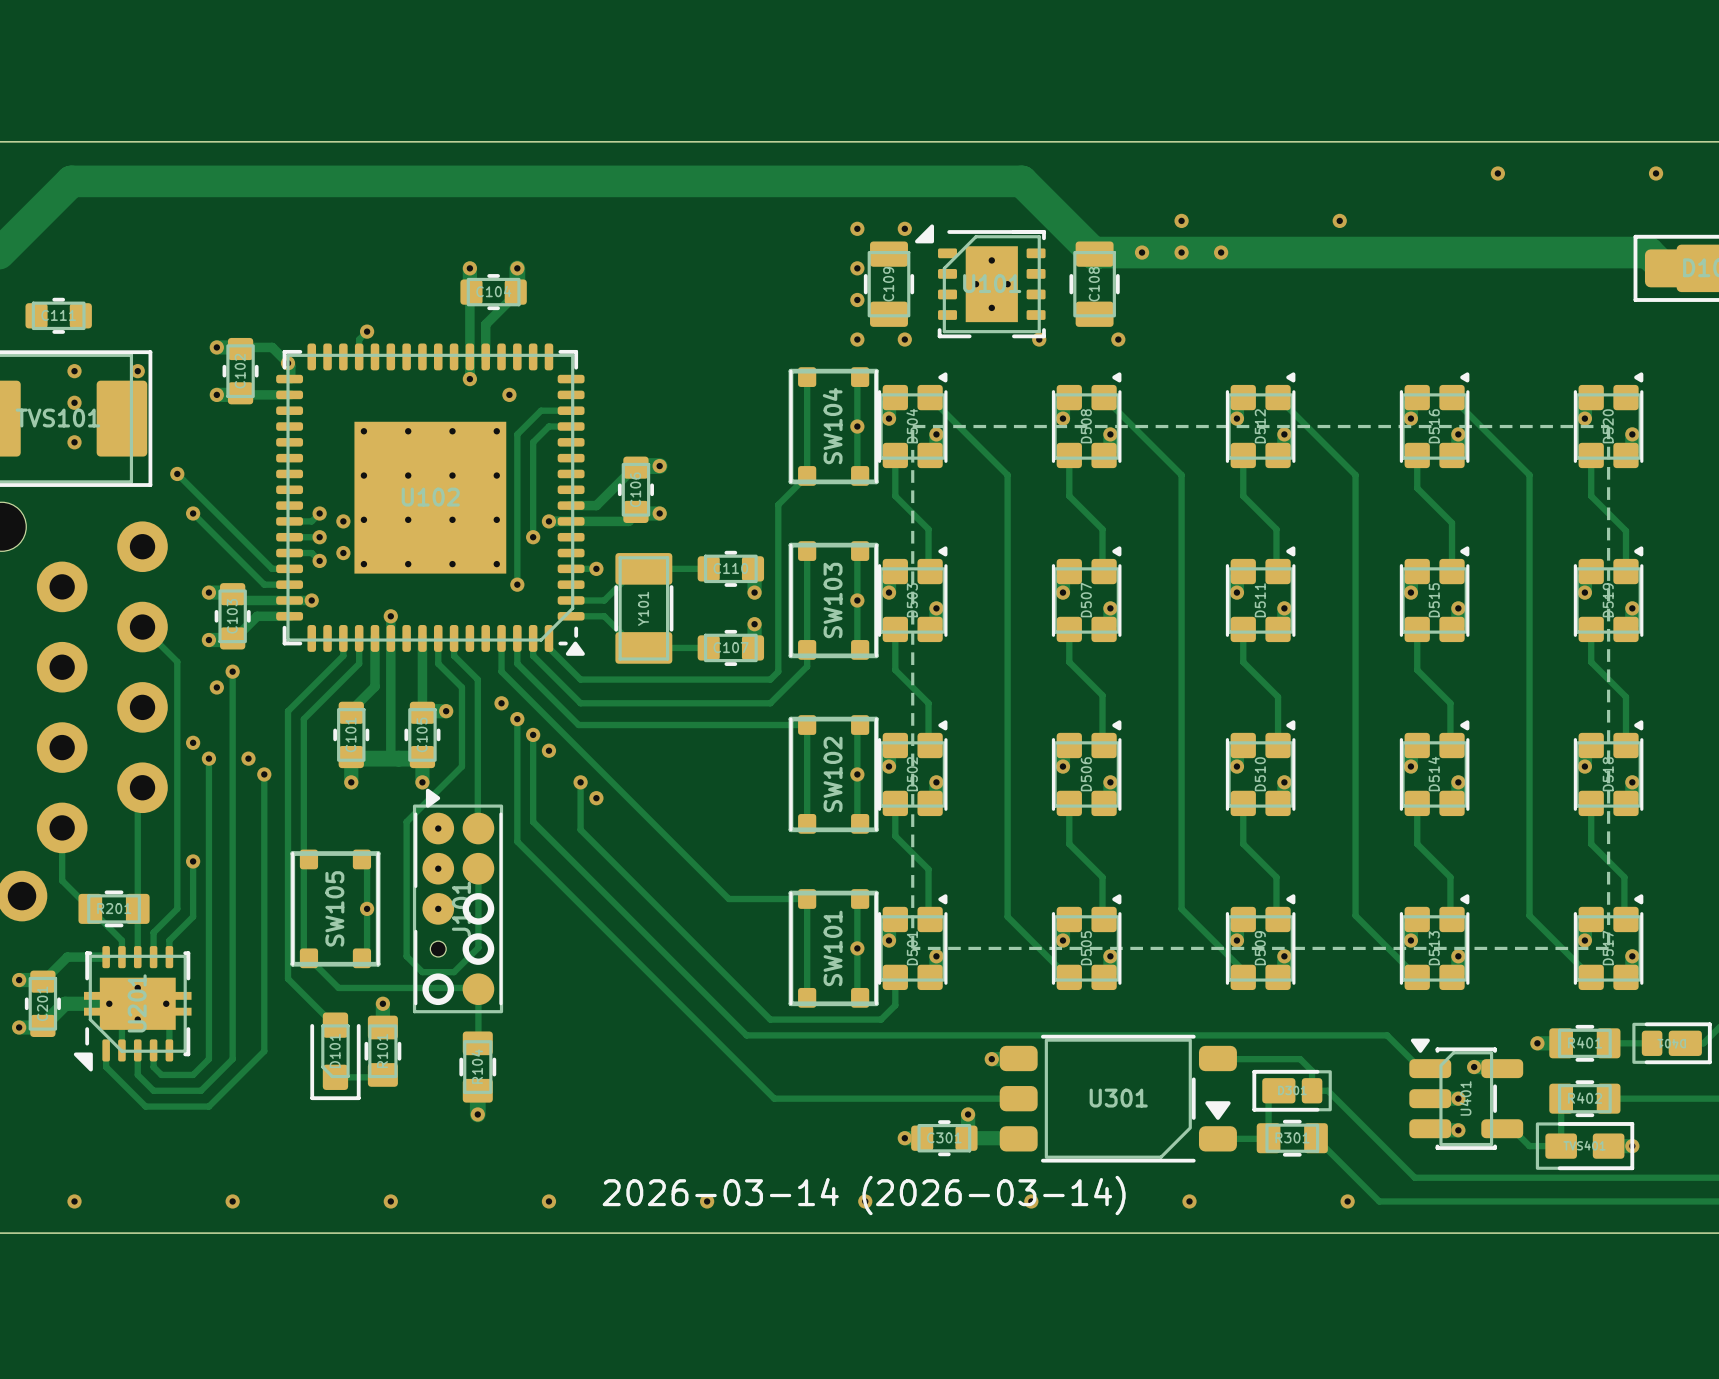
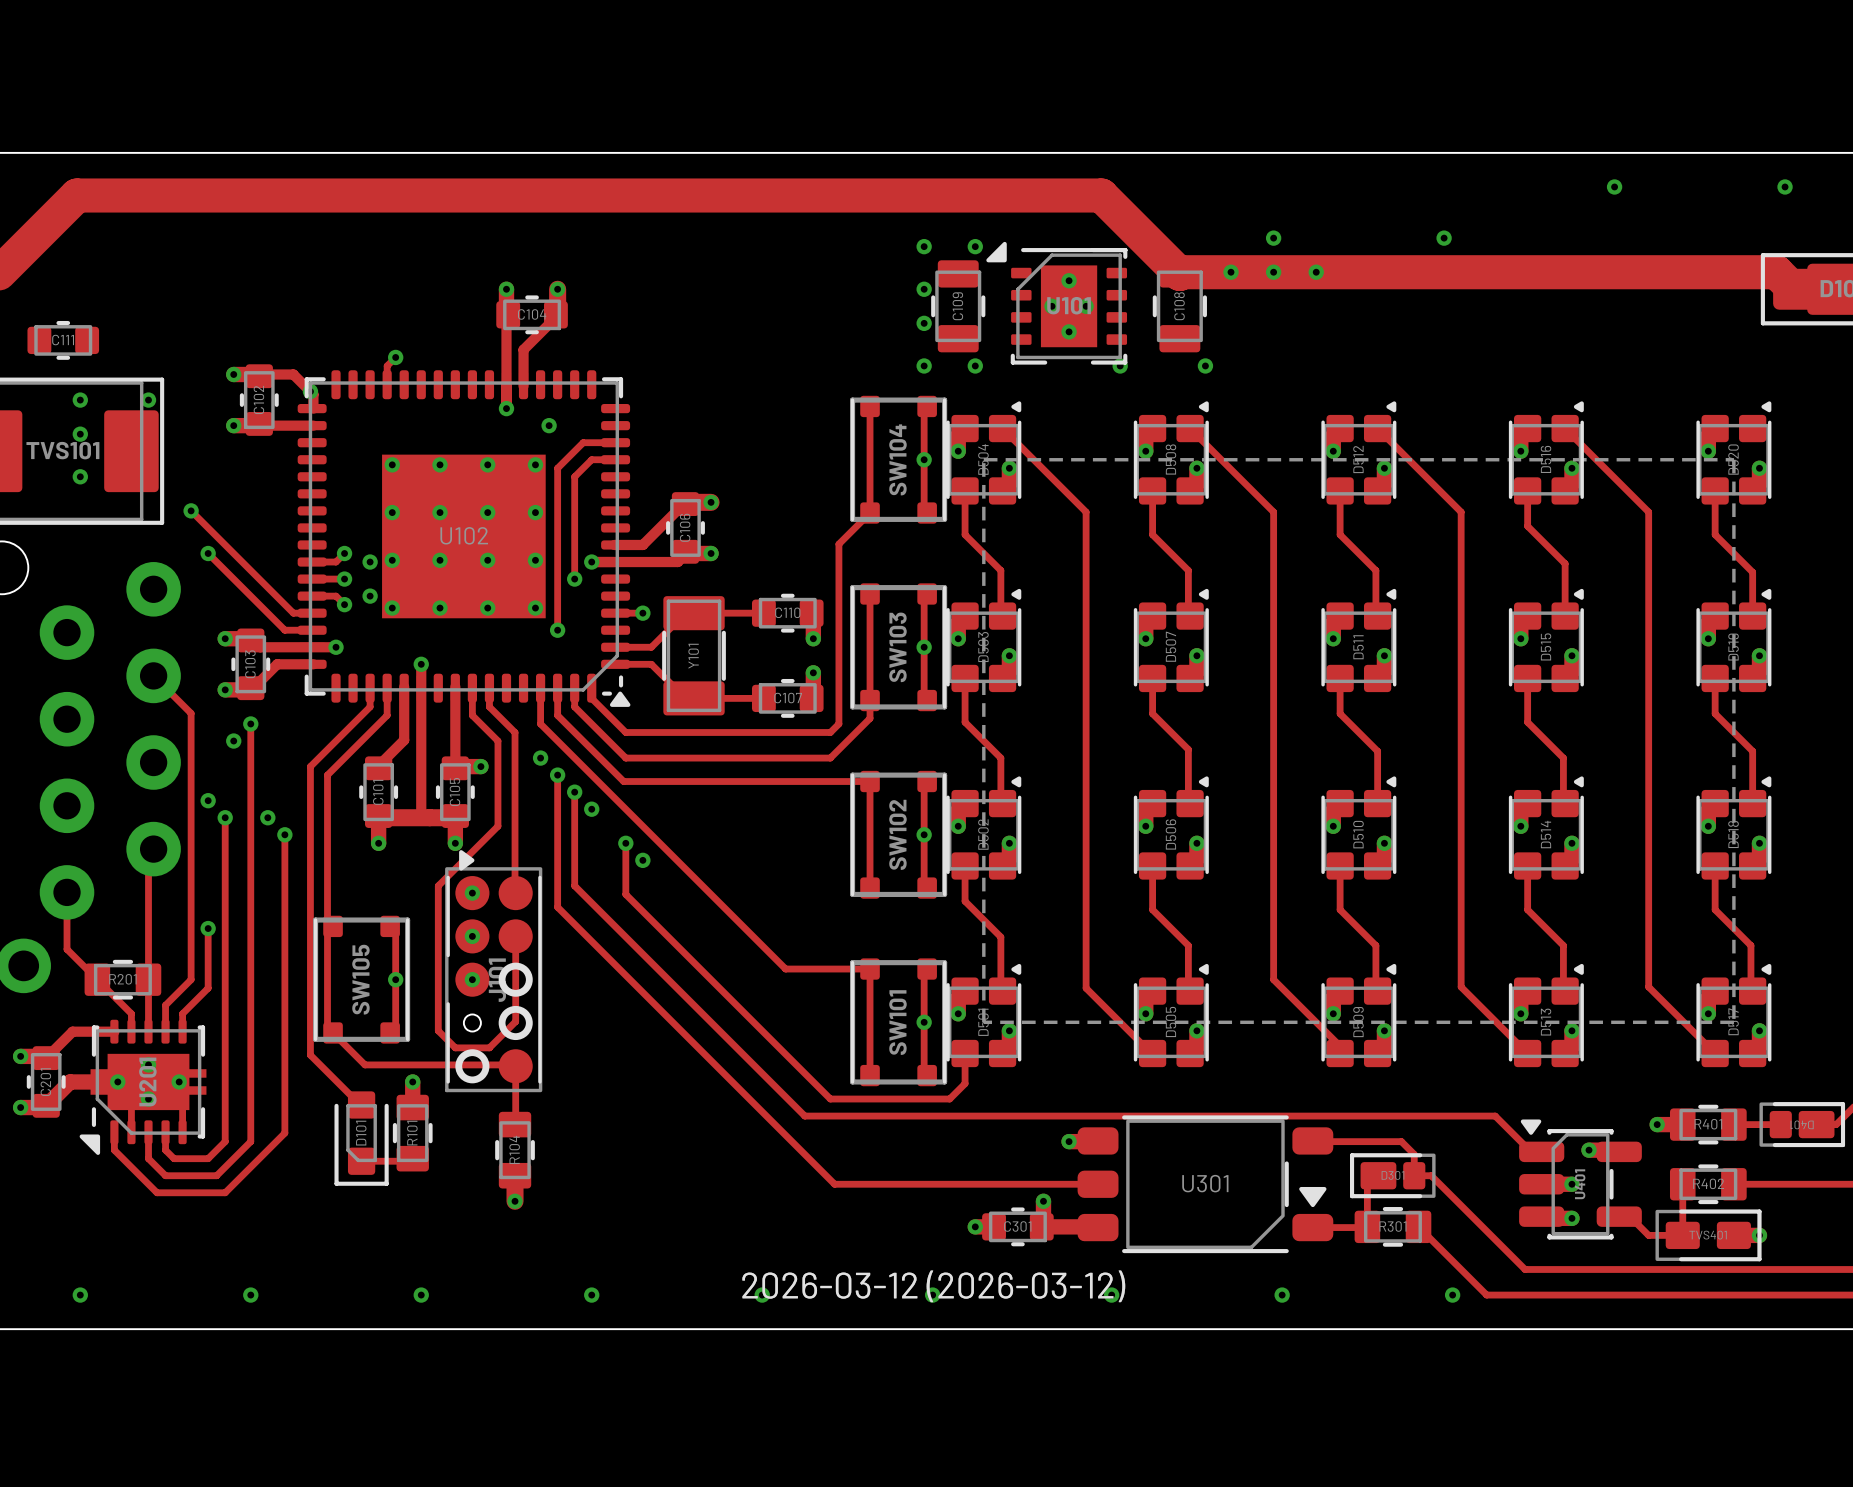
drawing shape: [602, 1175, 1126, 1216] -> [742, 1270, 1126, 1303]

